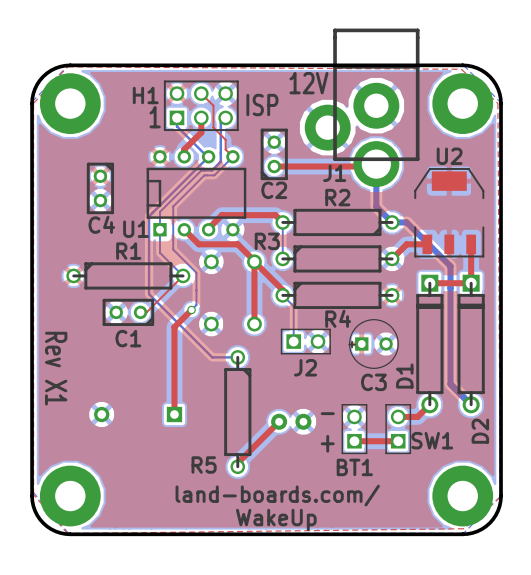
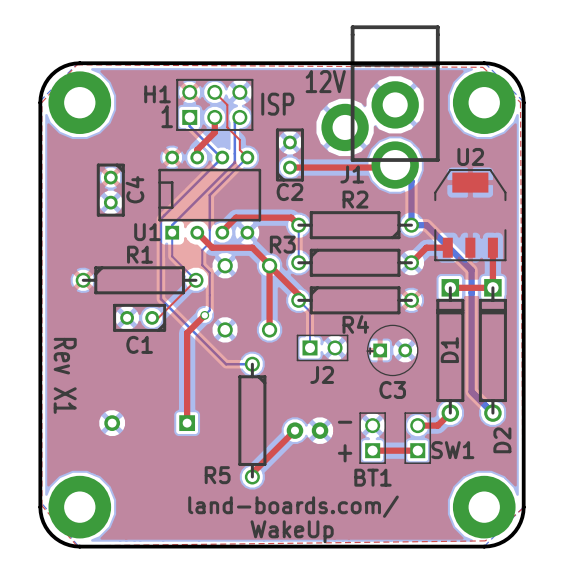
bottom track: (225, 117) (221, 122) (221, 161) (211, 170) (201, 170) (159, 211) (159, 222) -> (225, 171) (172, 225)
bottom track: (376, 164) (376, 206) (392, 222) -> (395, 165) (411, 181) (411, 225)
bottom track: (214, 175) (204, 175) (173, 206) (173, 249) (196, 272) -> (228, 176) (209, 195) (209, 242) (202, 250) (202, 265) (209, 272) (209, 277)
C4 name rotation: 0° (101, 224) -> 90° counterclockwise (134, 189)
C4 name position: C4 (101, 224) -> C4 (134, 189)
D1 name position: D1 (404, 376) -> D1 (449, 350)

